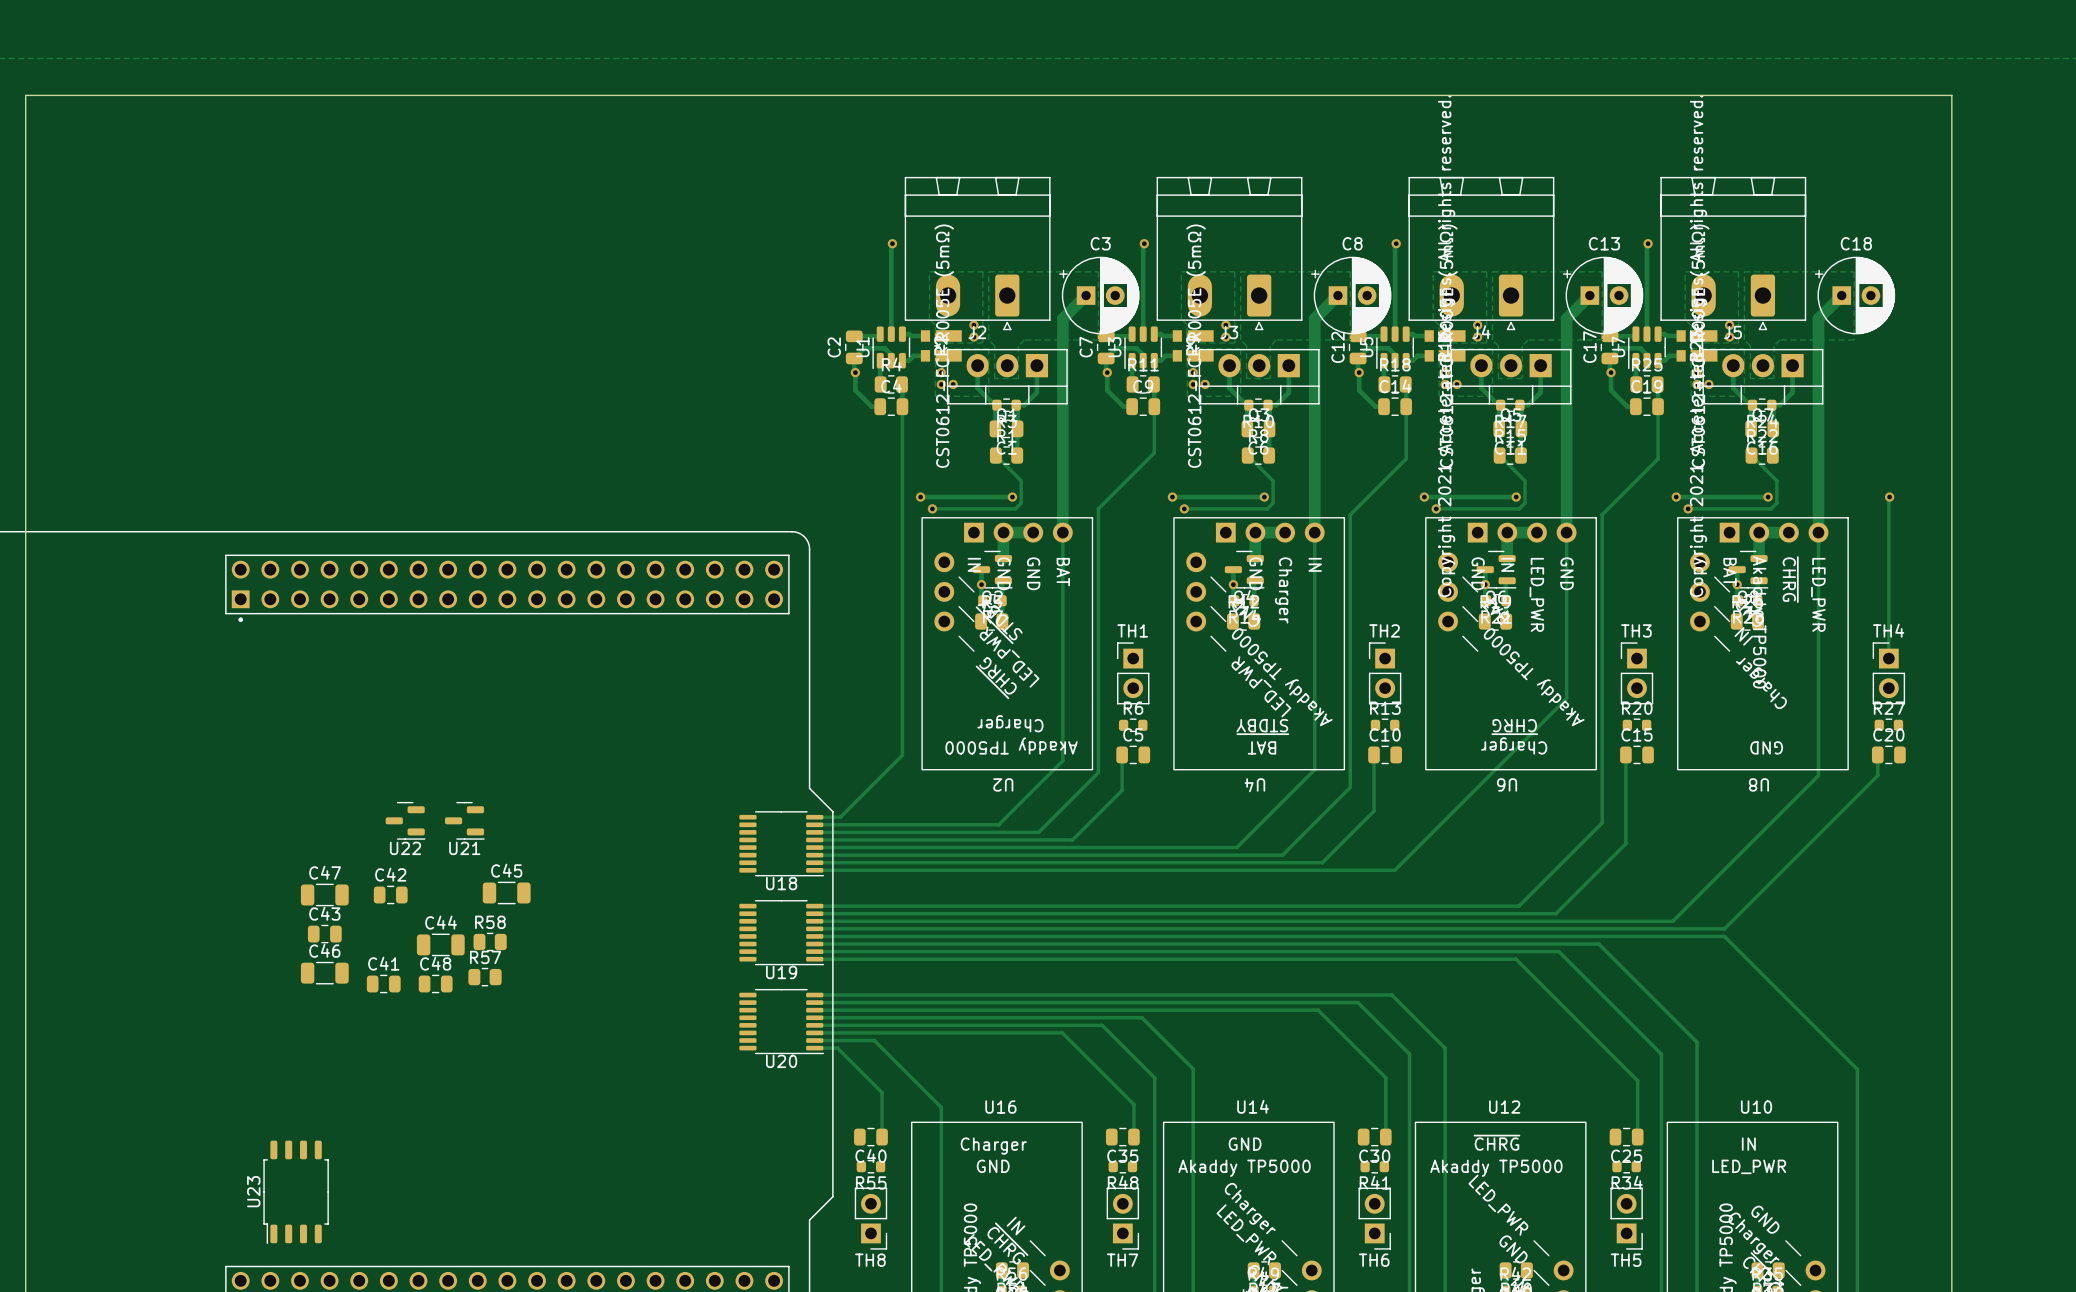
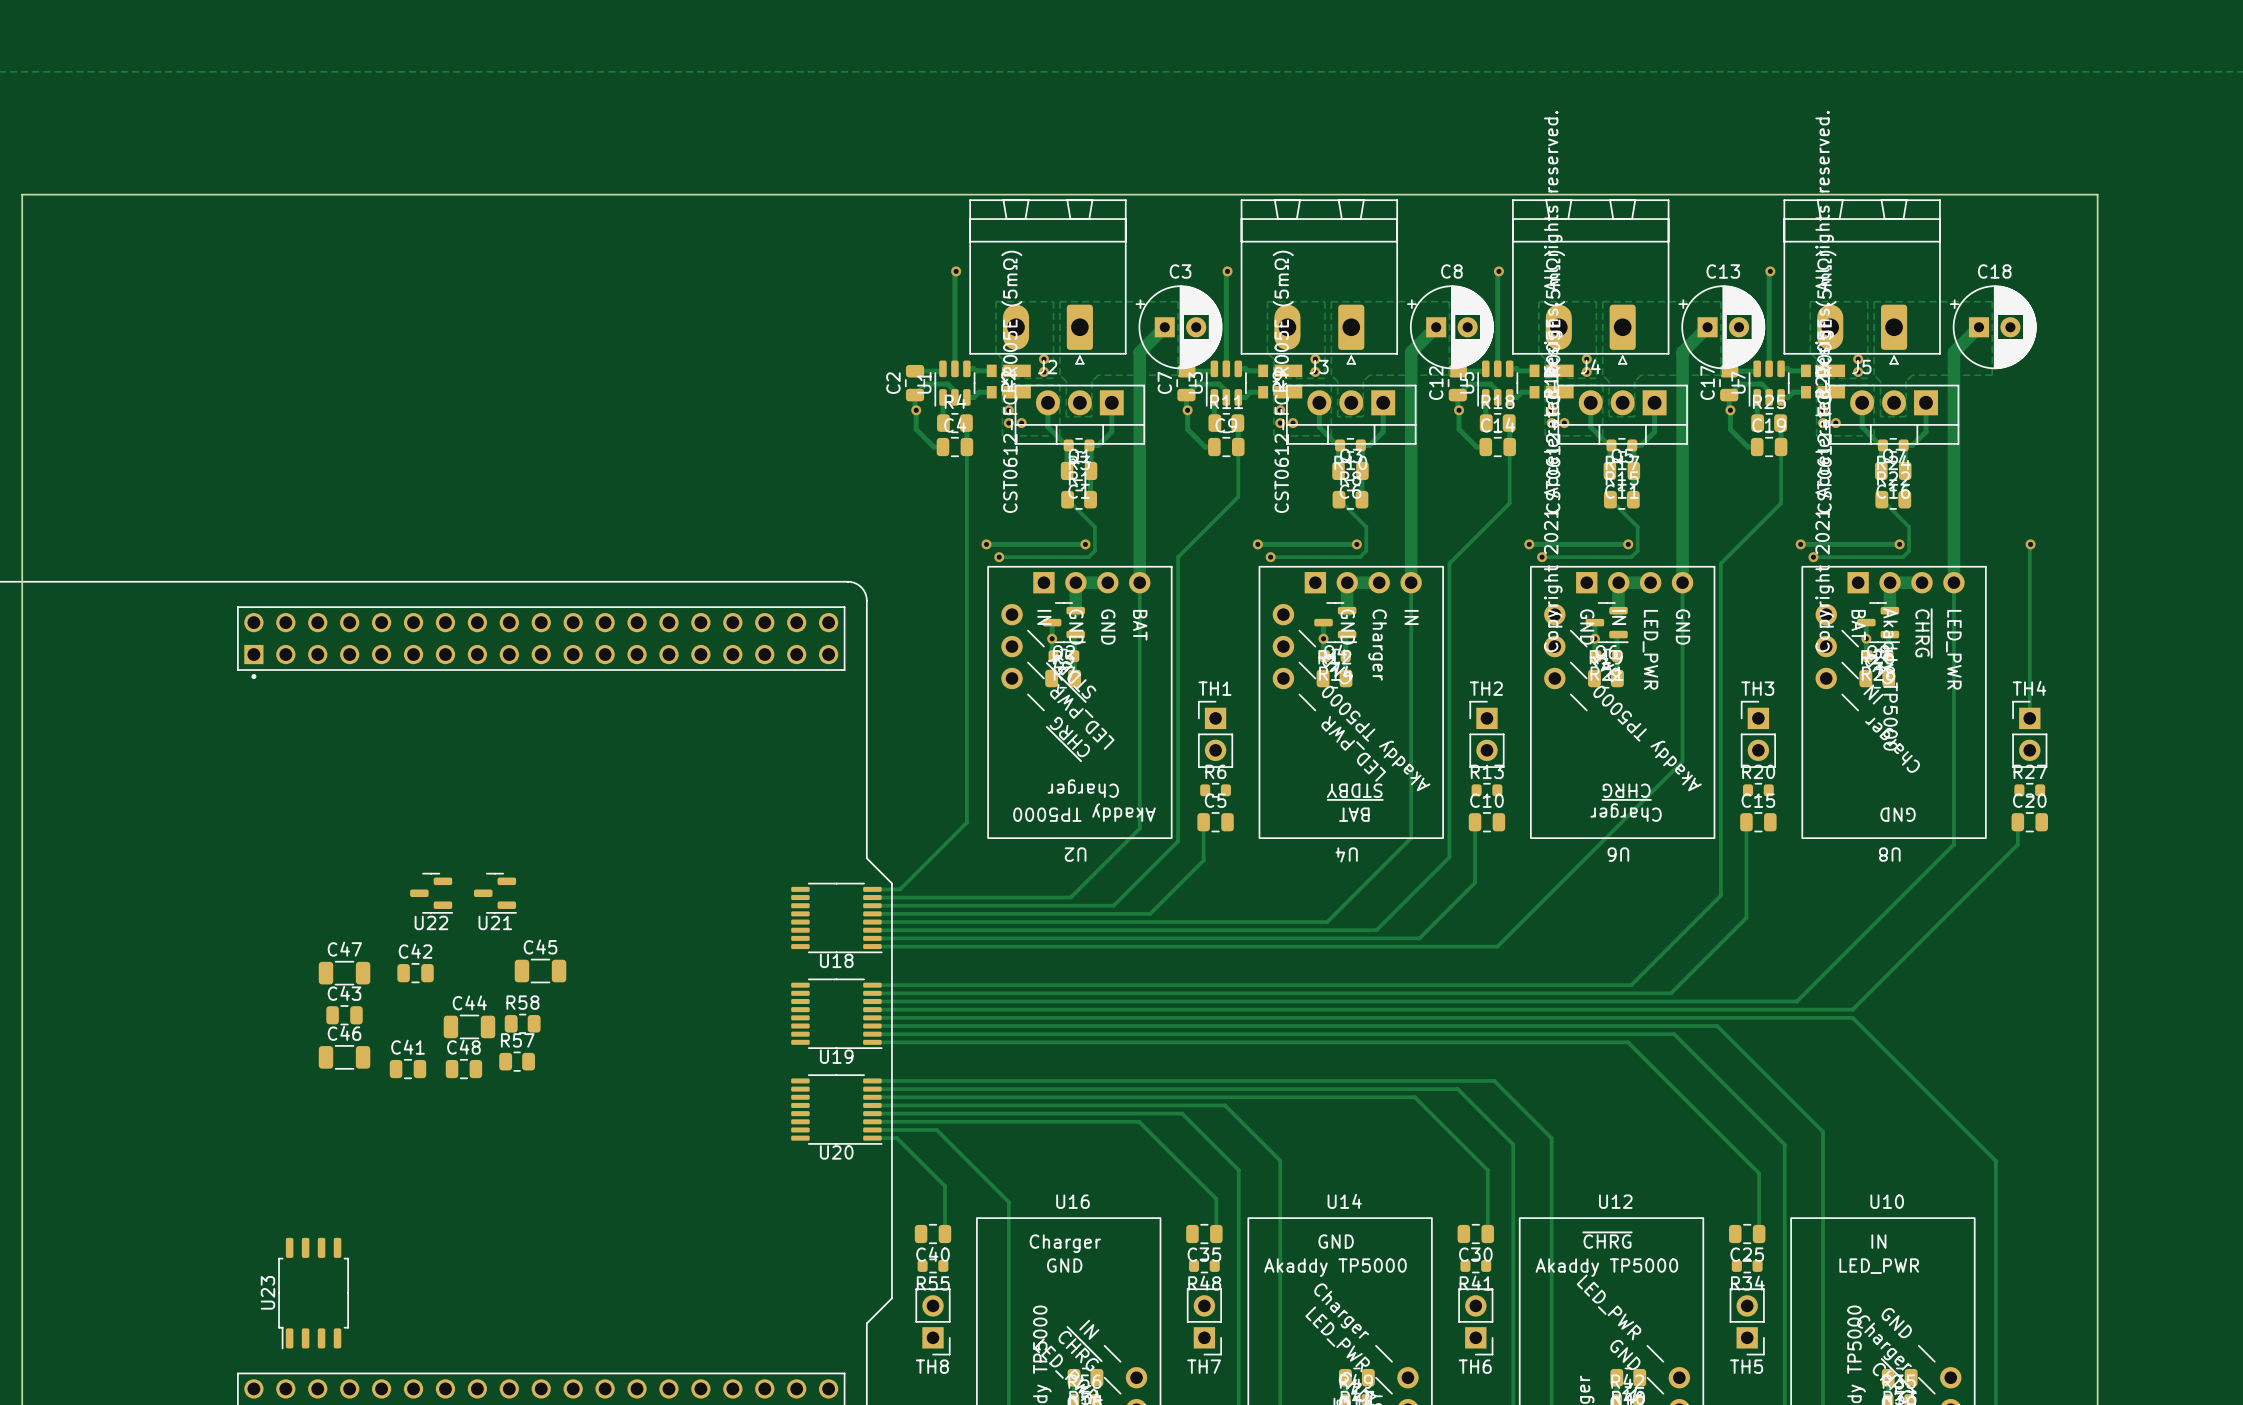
board edge: (25, 172) (25, 95) (1951, 95) (1951, 172) -> (22, 194) (2097, 194)

